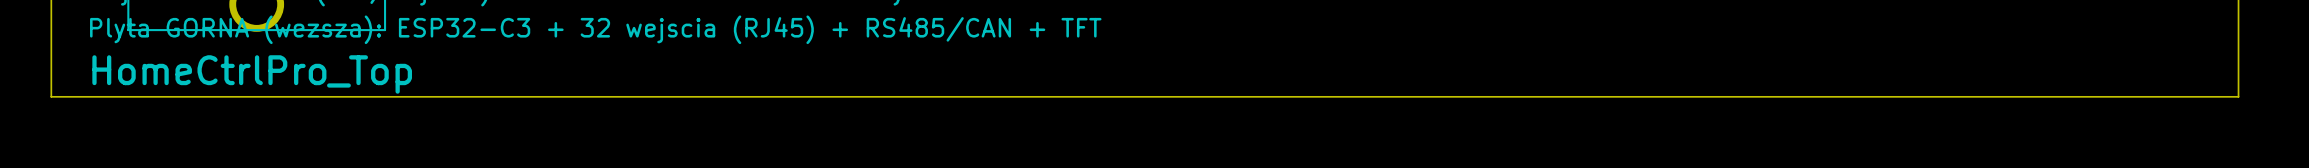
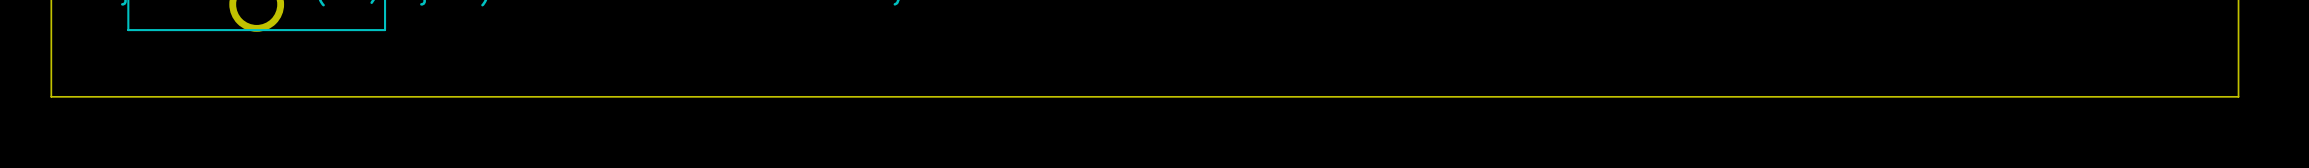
text: Plyta GORNA (wezsza): ESP32-C3 + 32 wejscia (RJ45) + RS485/CAN + TFT (595, 29) -> none
text: HomeCtrlPro_Top (252, 74) -> none

